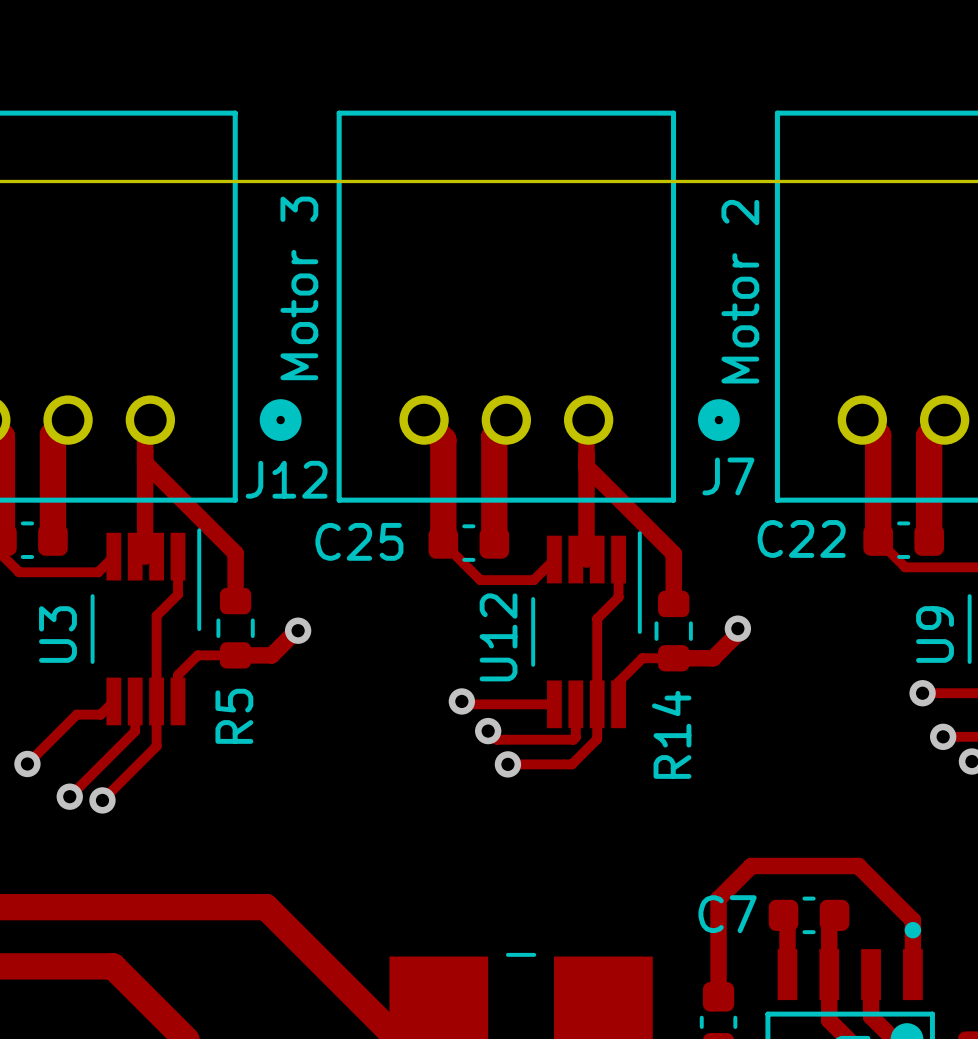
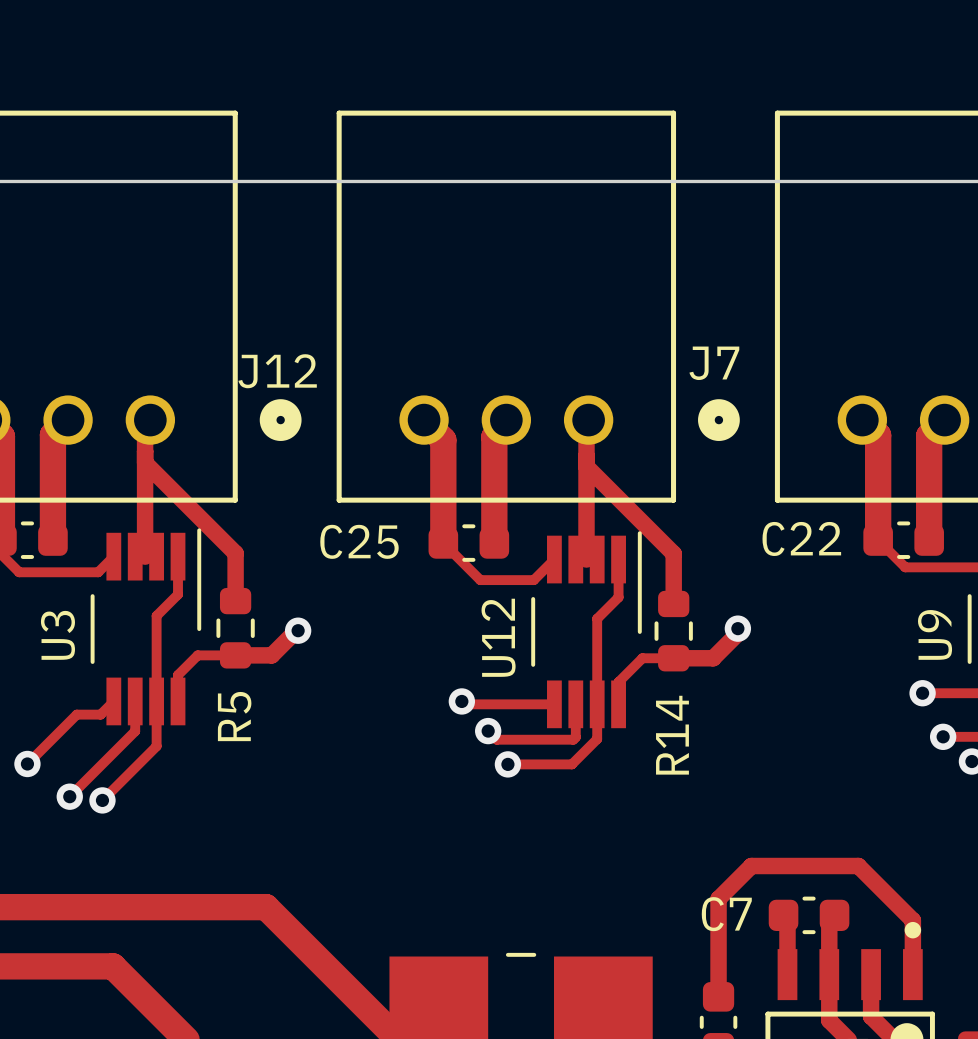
text: Motor 3 (299, 288) -> none
text: Motor 2 (740, 291) -> none
J7 name position: J7 (728, 476) -> J7 (714, 363)
J12 name position: J12 (286, 479) -> J12 (277, 371)

